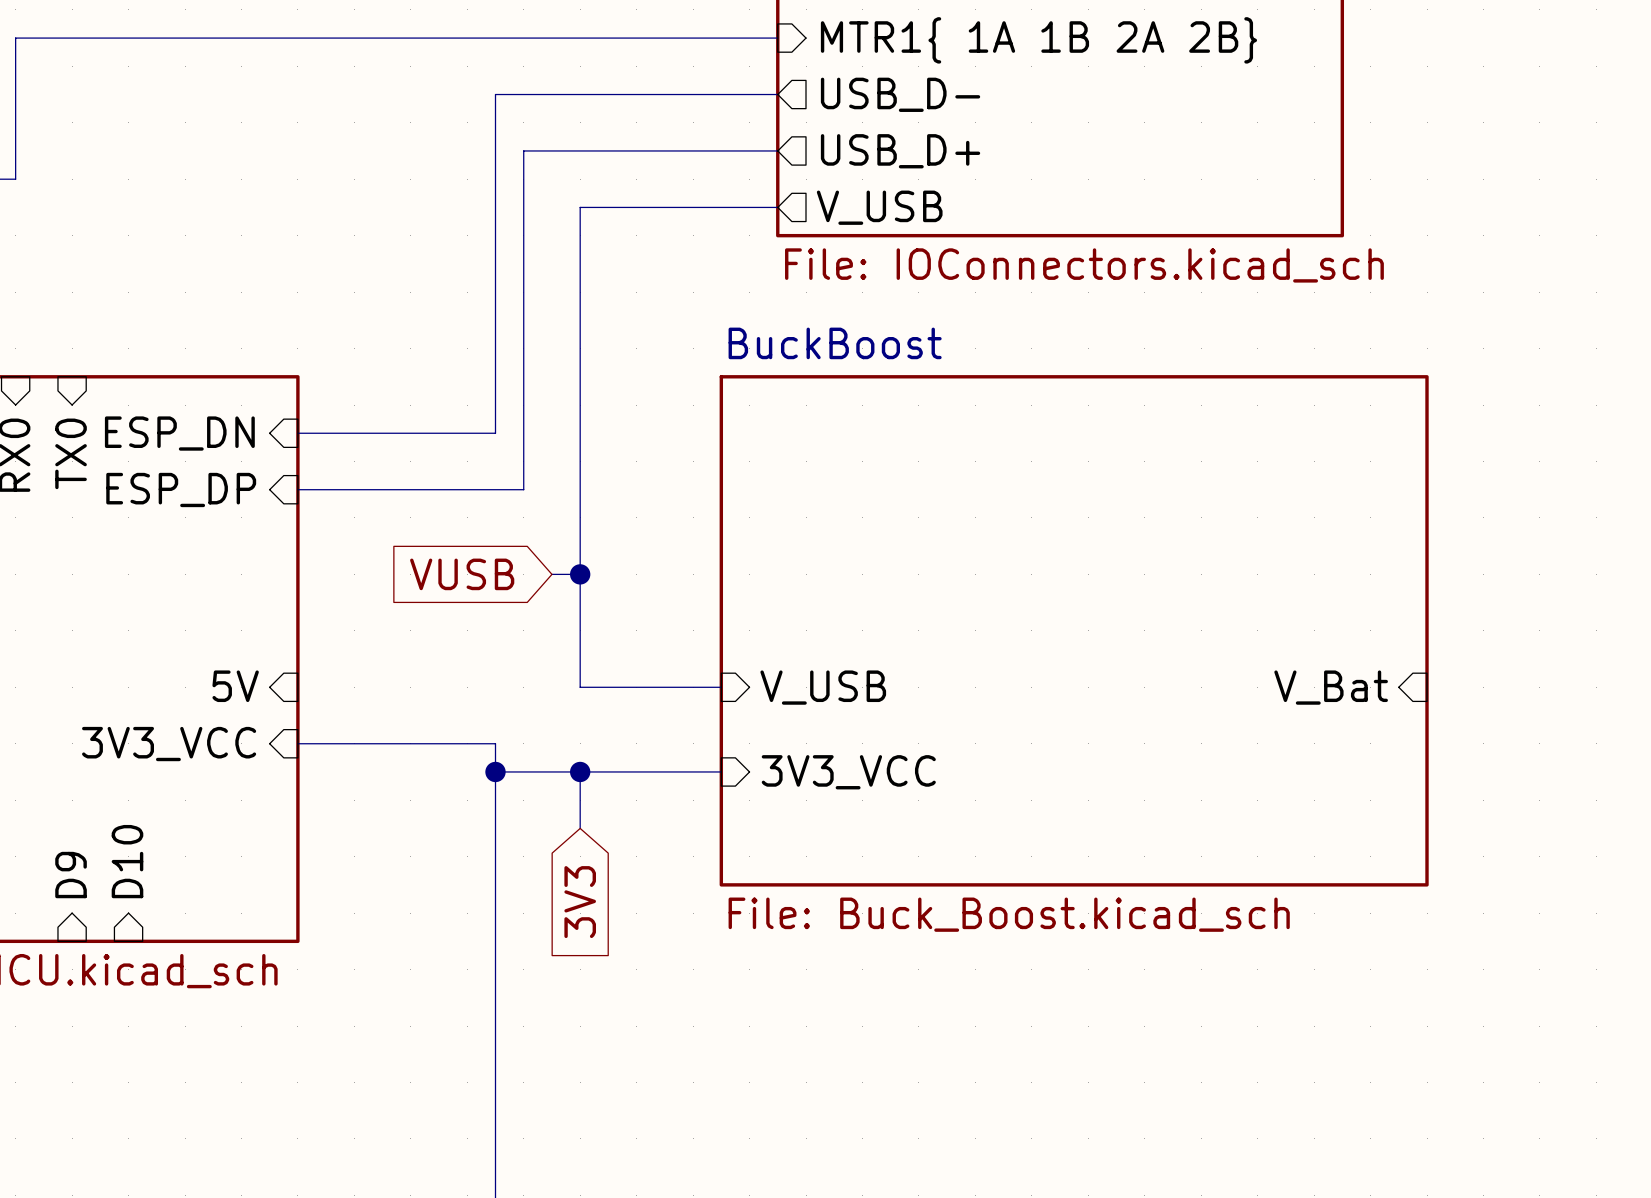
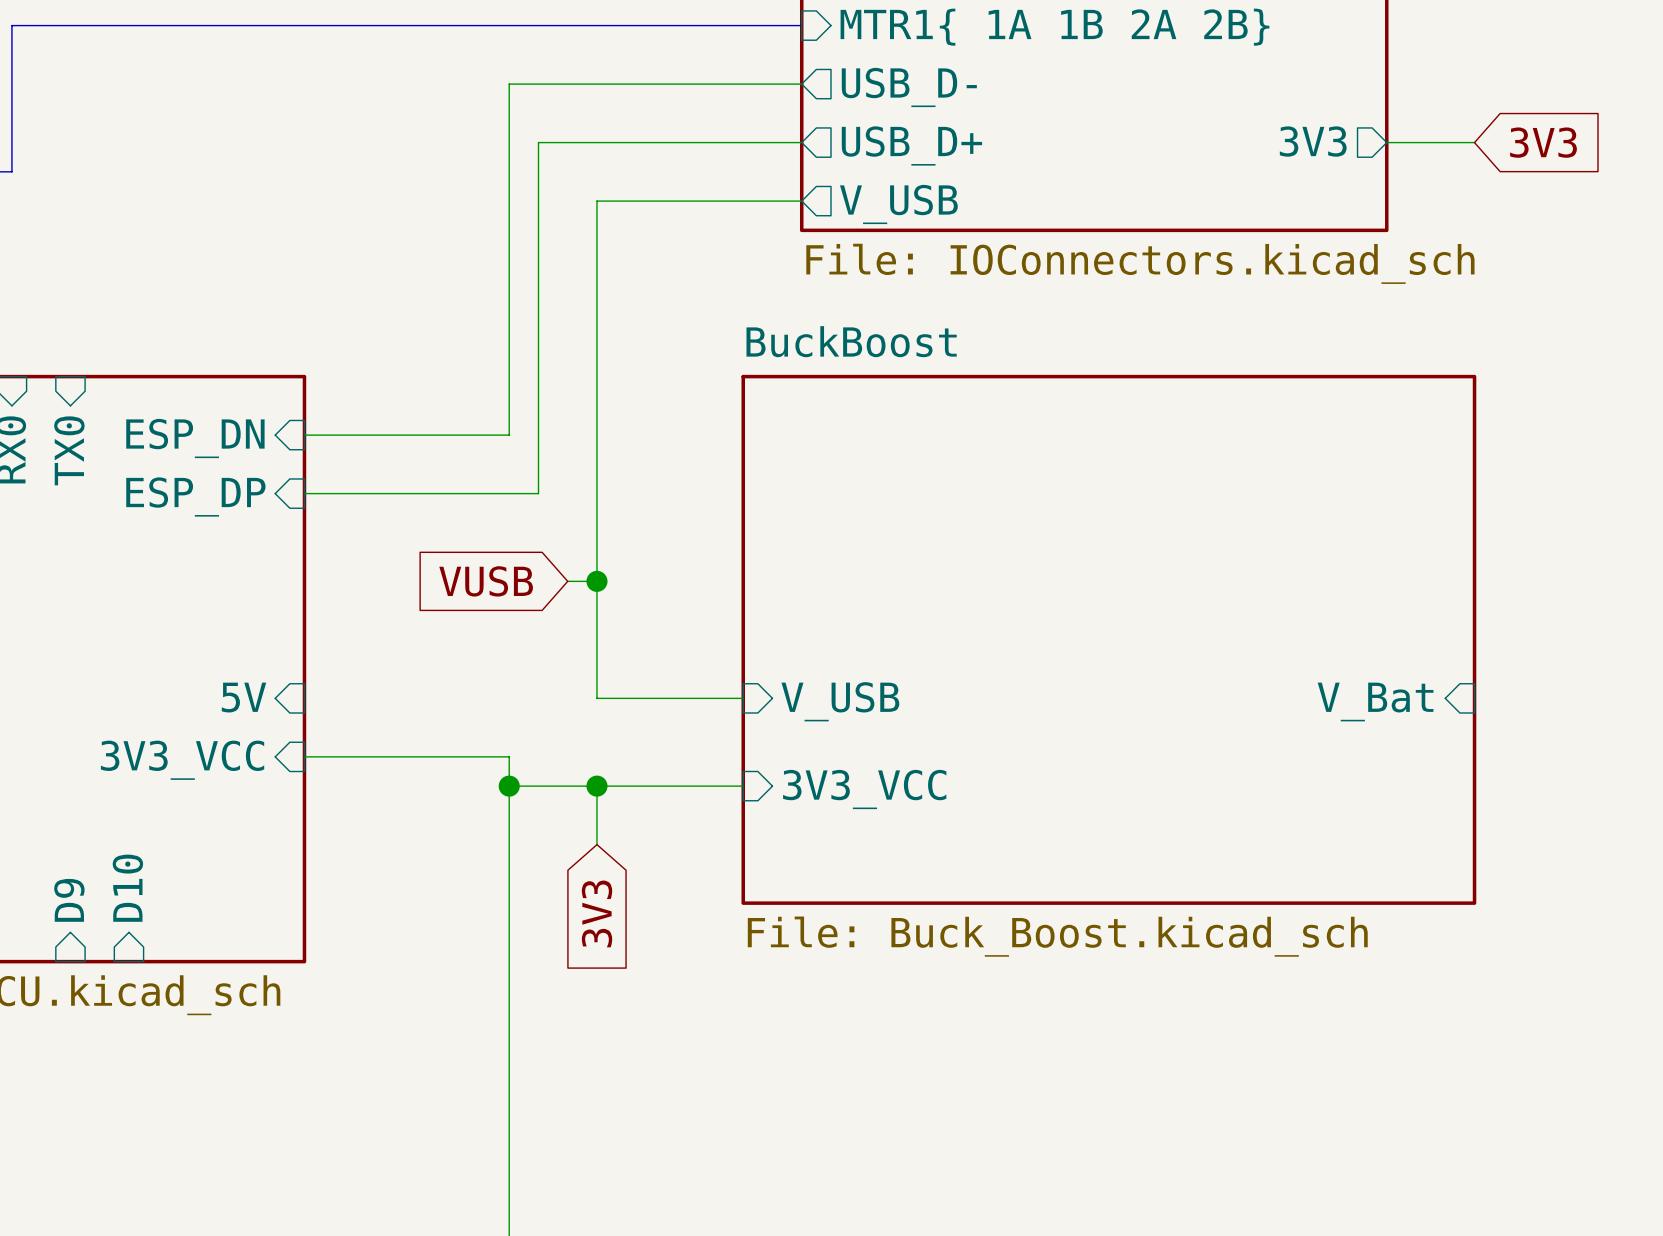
sheet pin: none -> 3V3 (1313, 141)
wire: none -> (1386, 142) (1474, 142)
global label: none -> 3V3 (1543, 142)

